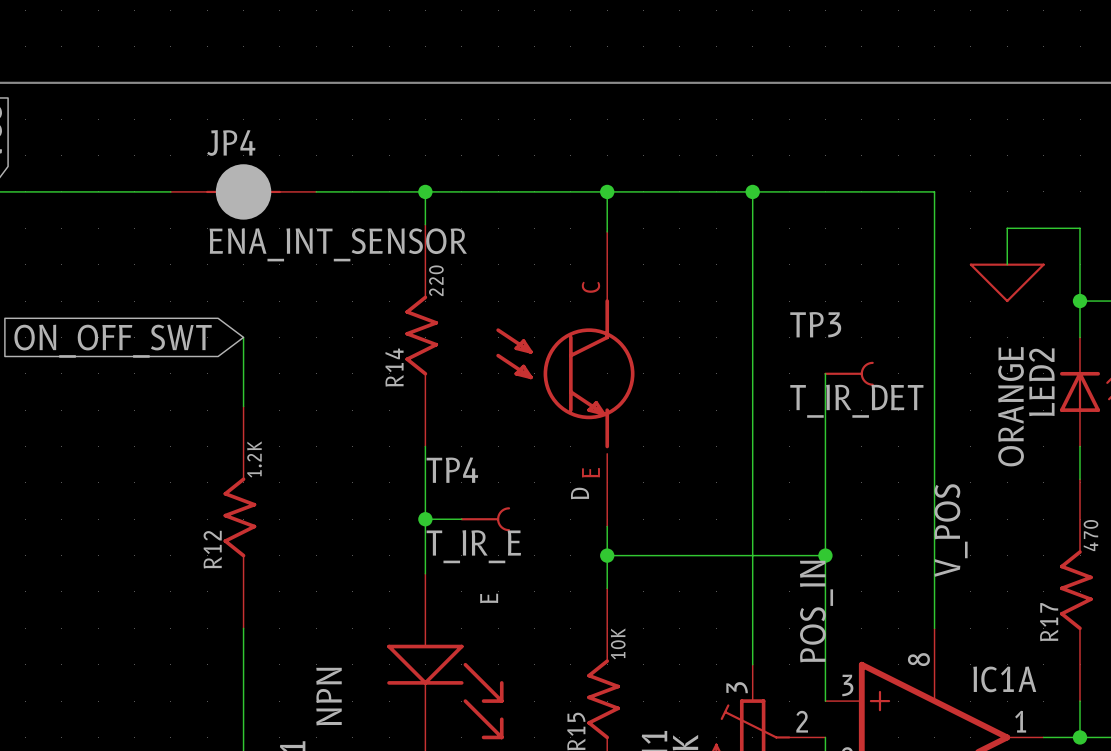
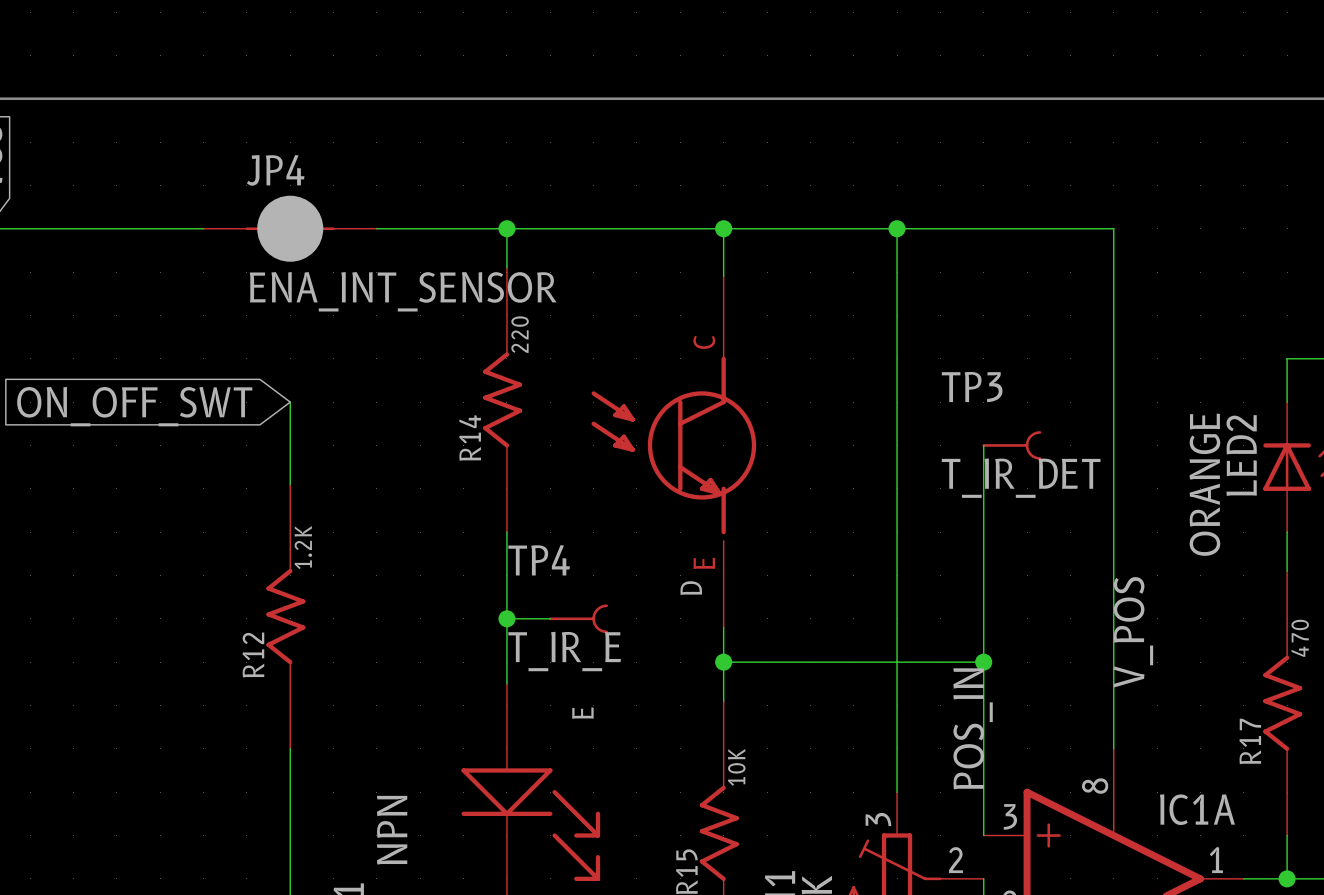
wire: (1007, 264) (1007, 228) (1080, 228) (1080, 301) -> none
power symbol: (1007, 282) -> none
junction: (1080, 301) -> none

